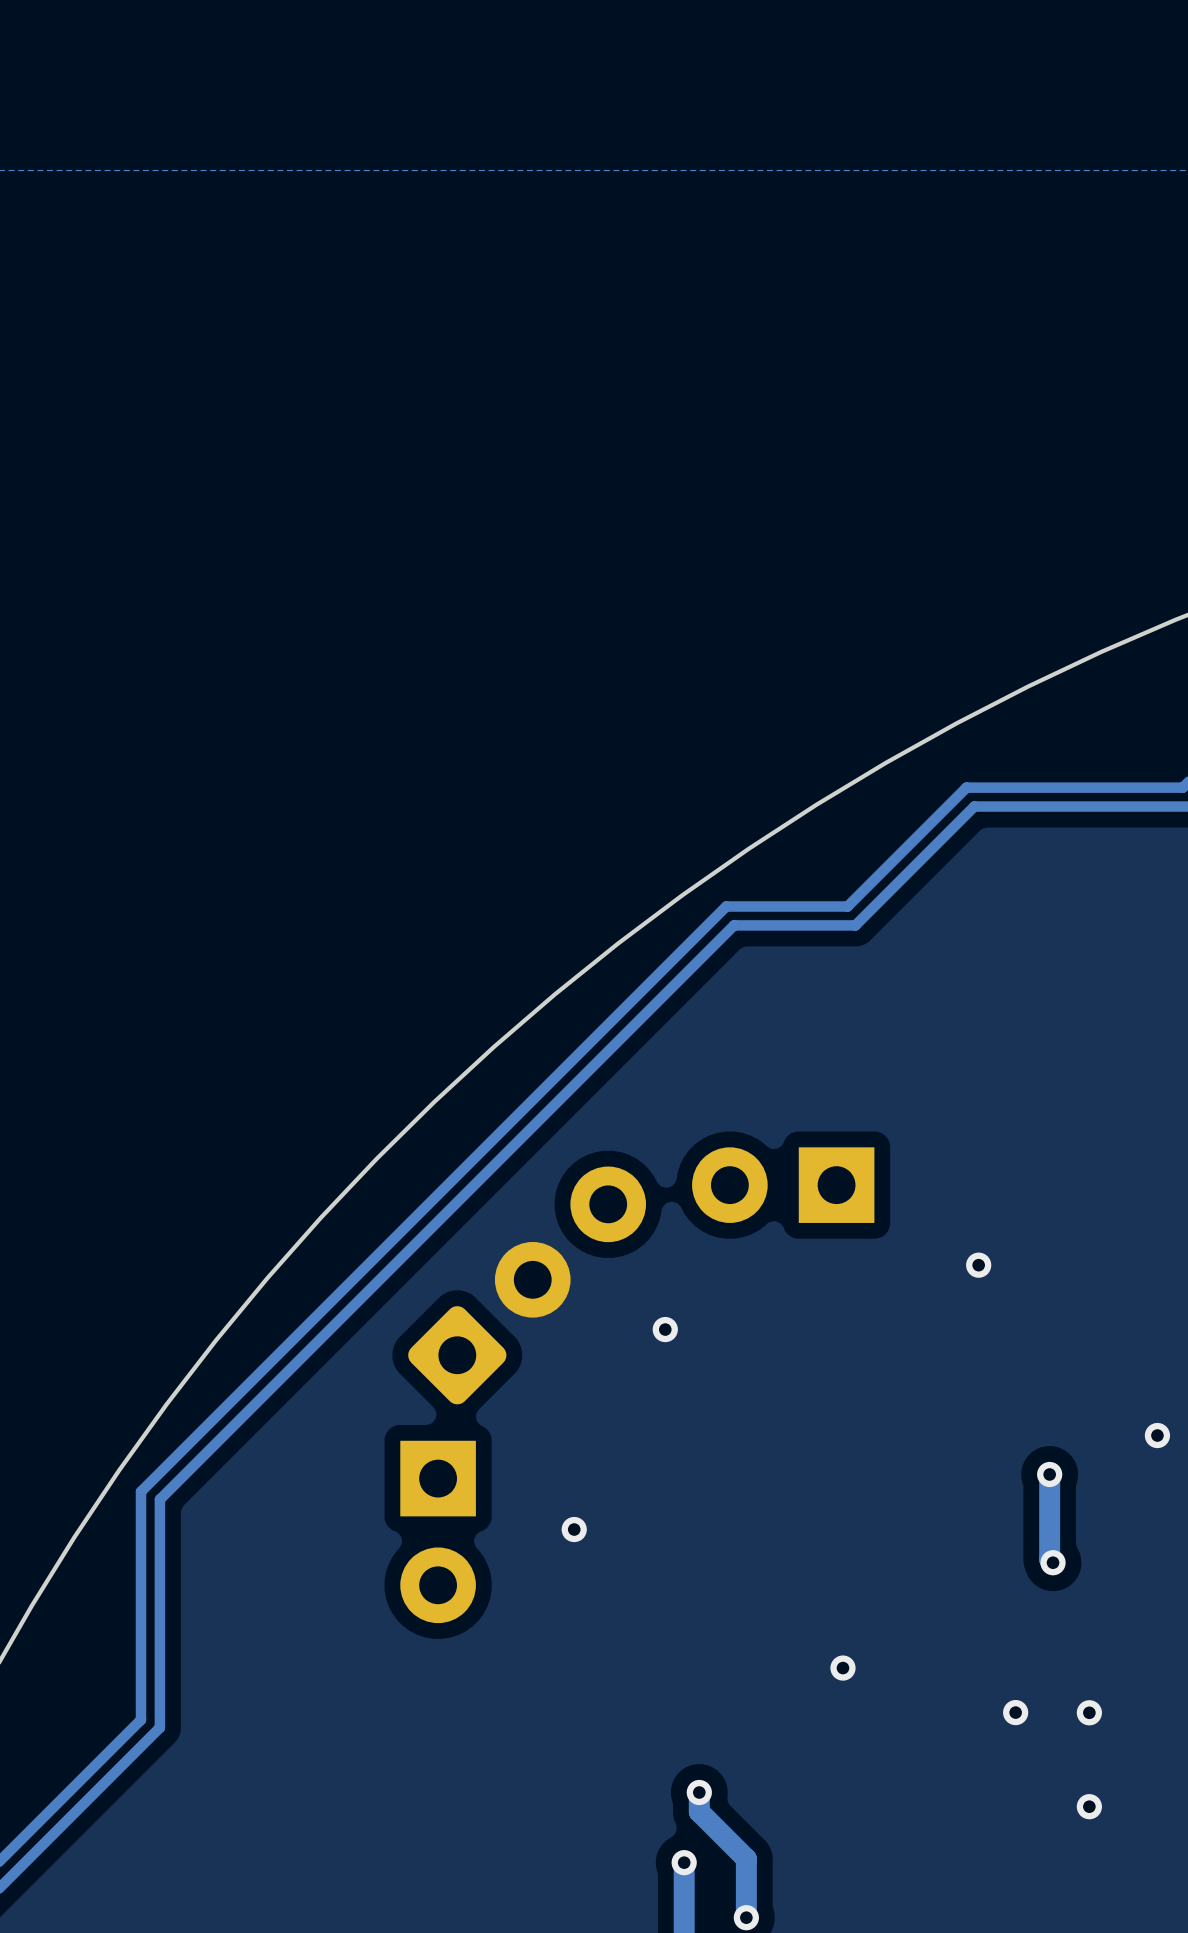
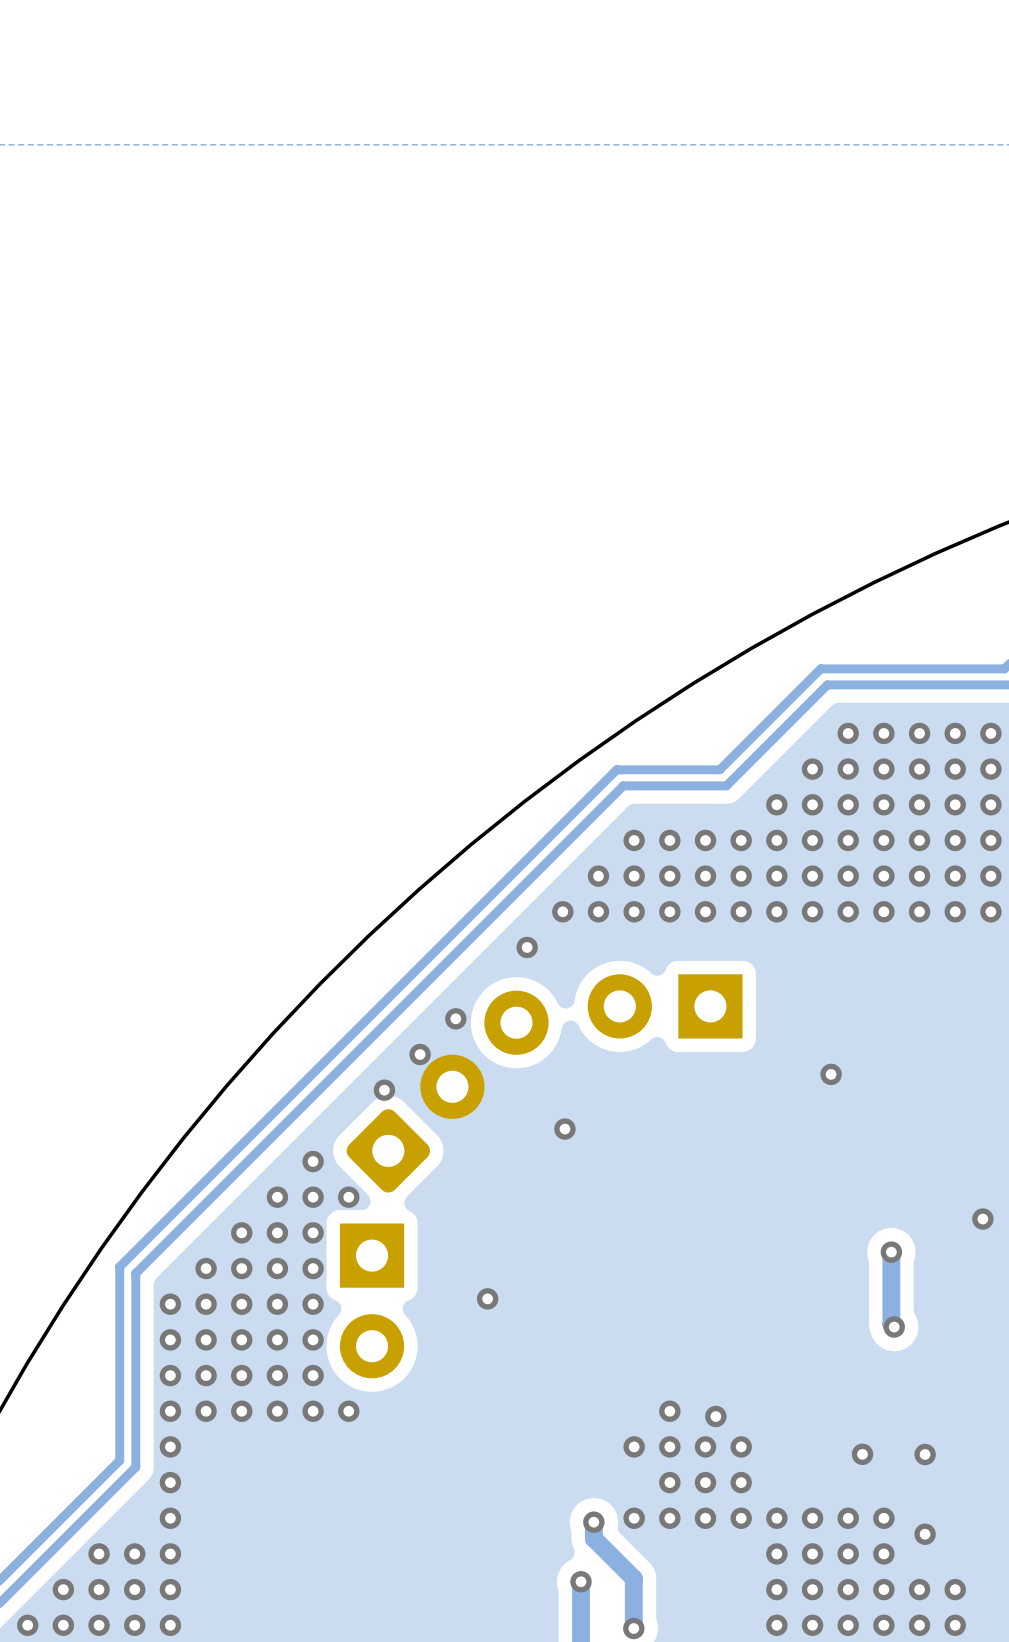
via: none -> (848, 733)
via: none -> (883, 733)
via: none -> (919, 733)
via: none -> (955, 733)
via: none -> (990, 733)
via: none -> (812, 769)
via: none -> (848, 769)
via: none -> (883, 769)
via: none -> (919, 769)
via: none -> (955, 769)
via: none -> (990, 769)
via: none -> (776, 804)
via: none -> (812, 804)
via: none -> (848, 804)
via: none -> (883, 804)
via: none -> (919, 804)
via: none -> (955, 804)
via: none -> (990, 804)
via: none -> (634, 840)
via: none -> (669, 840)
via: none -> (705, 840)
via: none -> (741, 840)
via: none -> (776, 840)
via: none -> (812, 840)
via: none -> (848, 840)
via: none -> (883, 840)
via: none -> (919, 840)
via: none -> (955, 840)
via: none -> (990, 840)
via: none -> (598, 876)
via: none -> (634, 876)
via: none -> (669, 876)
via: none -> (705, 876)
via: none -> (741, 876)
via: none -> (776, 876)
via: none -> (812, 876)
via: none -> (848, 876)
via: none -> (883, 876)
via: none -> (919, 876)
via: none -> (955, 876)
via: none -> (990, 876)
via: none -> (562, 911)
via: none -> (598, 911)
via: none -> (634, 911)
via: none -> (669, 911)
via: none -> (705, 911)
via: none -> (741, 911)
via: none -> (776, 911)
via: none -> (812, 911)
via: none -> (848, 911)
via: none -> (883, 911)
via: none -> (919, 911)
via: none -> (955, 911)
via: none -> (990, 911)
via: none -> (527, 947)
via: none -> (455, 1018)
via: none -> (420, 1054)
via: none -> (384, 1090)
via: none -> (313, 1161)
via: none -> (277, 1197)
via: none -> (313, 1197)
via: none -> (348, 1197)
via: none -> (241, 1232)
via: none -> (277, 1232)
via: none -> (313, 1232)
via: none -> (206, 1268)
via: none -> (241, 1268)
via: none -> (277, 1268)
via: none -> (313, 1268)
via: none -> (170, 1304)
via: none -> (206, 1304)
via: none -> (241, 1304)
via: none -> (277, 1304)
via: none -> (313, 1304)
via: none -> (170, 1339)
via: none -> (206, 1339)
via: none -> (241, 1339)
via: none -> (277, 1339)
via: none -> (313, 1339)
via: none -> (170, 1375)
via: none -> (206, 1375)
via: none -> (241, 1375)
via: none -> (277, 1375)
via: none -> (313, 1375)
via: none -> (170, 1411)
via: none -> (206, 1411)
via: none -> (241, 1411)
via: none -> (277, 1411)
via: none -> (313, 1411)
via: none -> (348, 1411)
via: none -> (669, 1411)
via: none -> (170, 1446)
via: none -> (634, 1446)
via: none -> (669, 1446)
via: none -> (705, 1446)
via: none -> (741, 1446)
via: none -> (170, 1482)
via: none -> (669, 1482)
via: none -> (705, 1482)
via: none -> (741, 1482)
via: none -> (170, 1518)
via: none -> (634, 1518)
via: none -> (669, 1518)
via: none -> (705, 1518)
via: none -> (741, 1518)
via: none -> (776, 1518)
via: none -> (812, 1518)
via: none -> (848, 1518)
via: none -> (883, 1518)
via: none -> (99, 1553)
via: none -> (134, 1553)
via: none -> (170, 1553)
via: none -> (776, 1553)
via: none -> (812, 1553)
via: none -> (848, 1553)
via: none -> (883, 1553)
via: none -> (63, 1589)
via: none -> (99, 1589)
via: none -> (134, 1589)
via: none -> (170, 1589)
via: none -> (776, 1589)
via: none -> (812, 1589)
via: none -> (848, 1589)
via: none -> (883, 1589)
via: none -> (919, 1589)
via: none -> (955, 1589)
via: none -> (27, 1625)
via: none -> (63, 1625)
via: none -> (99, 1625)
via: none -> (134, 1625)
via: none -> (170, 1625)
via: none -> (776, 1625)
via: none -> (812, 1625)
via: none -> (848, 1625)
via: none -> (883, 1625)
via: none -> (919, 1625)
via: none -> (955, 1625)

